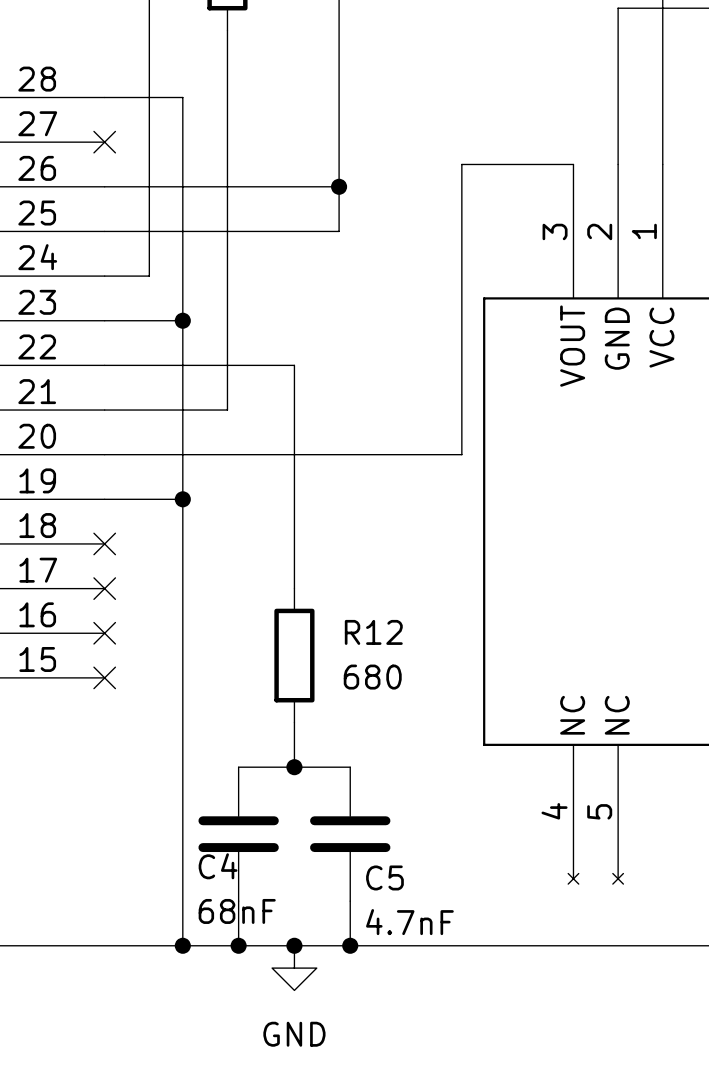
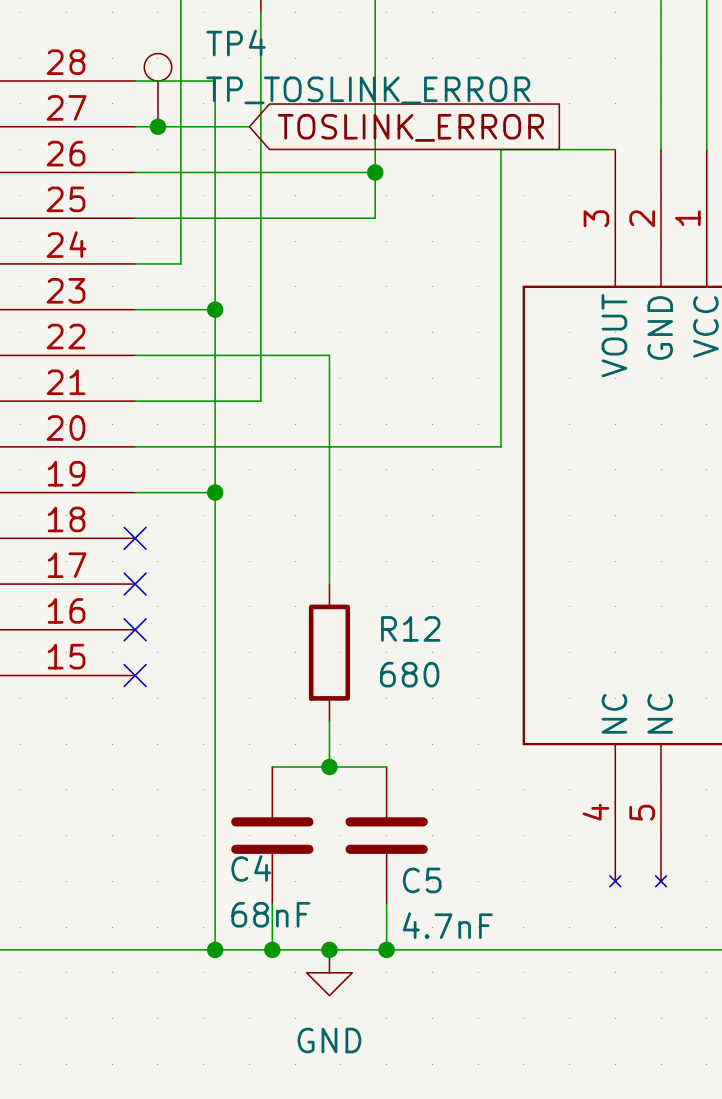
TP4: none -> TP_TOSLINK_ERROR (157, 90)
wire: none -> (135, 126) (249, 126)
no-connect mark: (104, 142) -> none
junction: none -> (157, 126)
global label: none -> TOSLINK_ERROR (410, 127)

